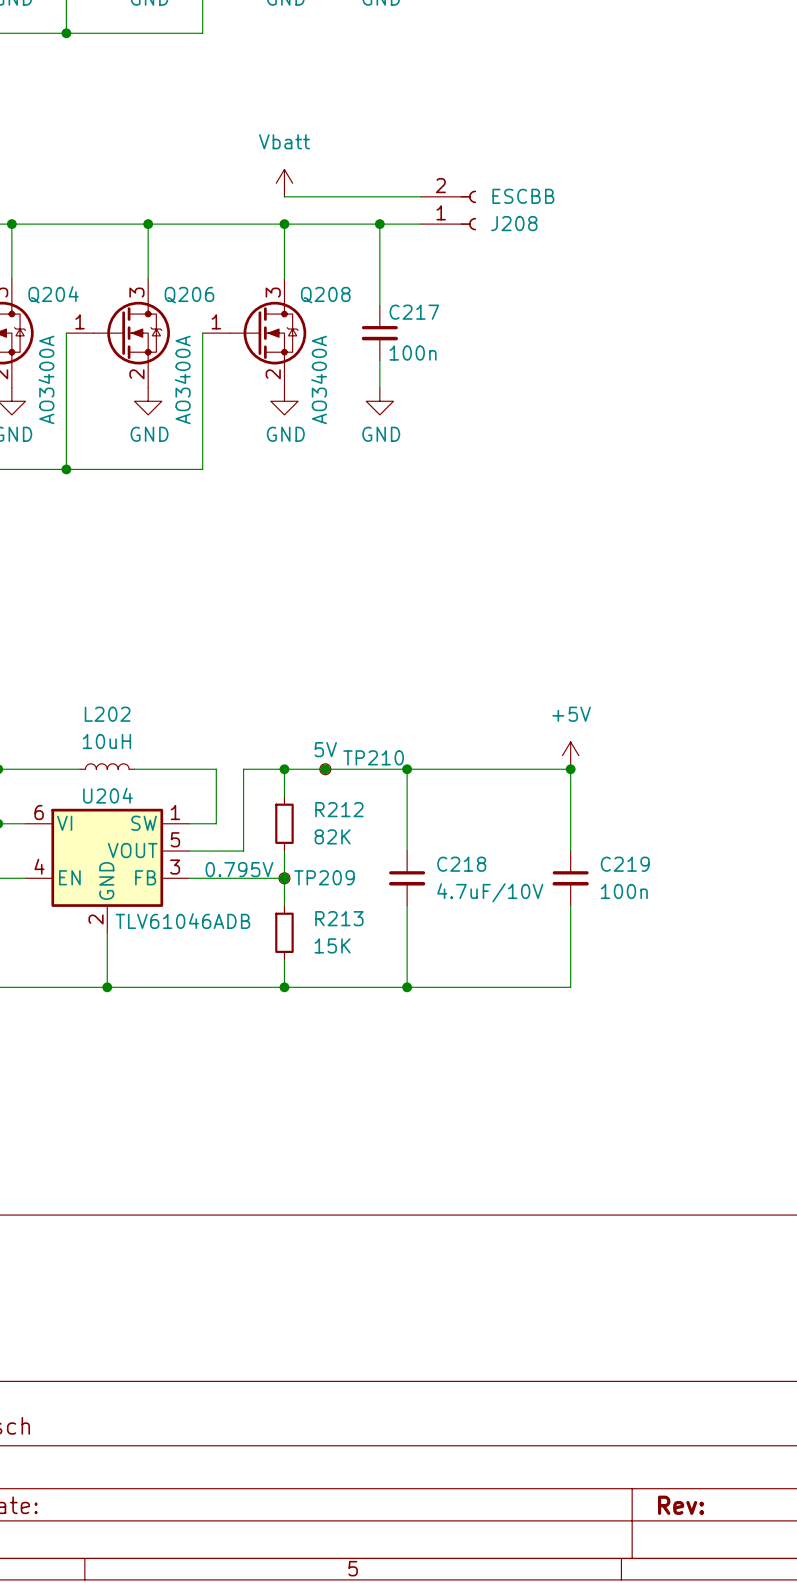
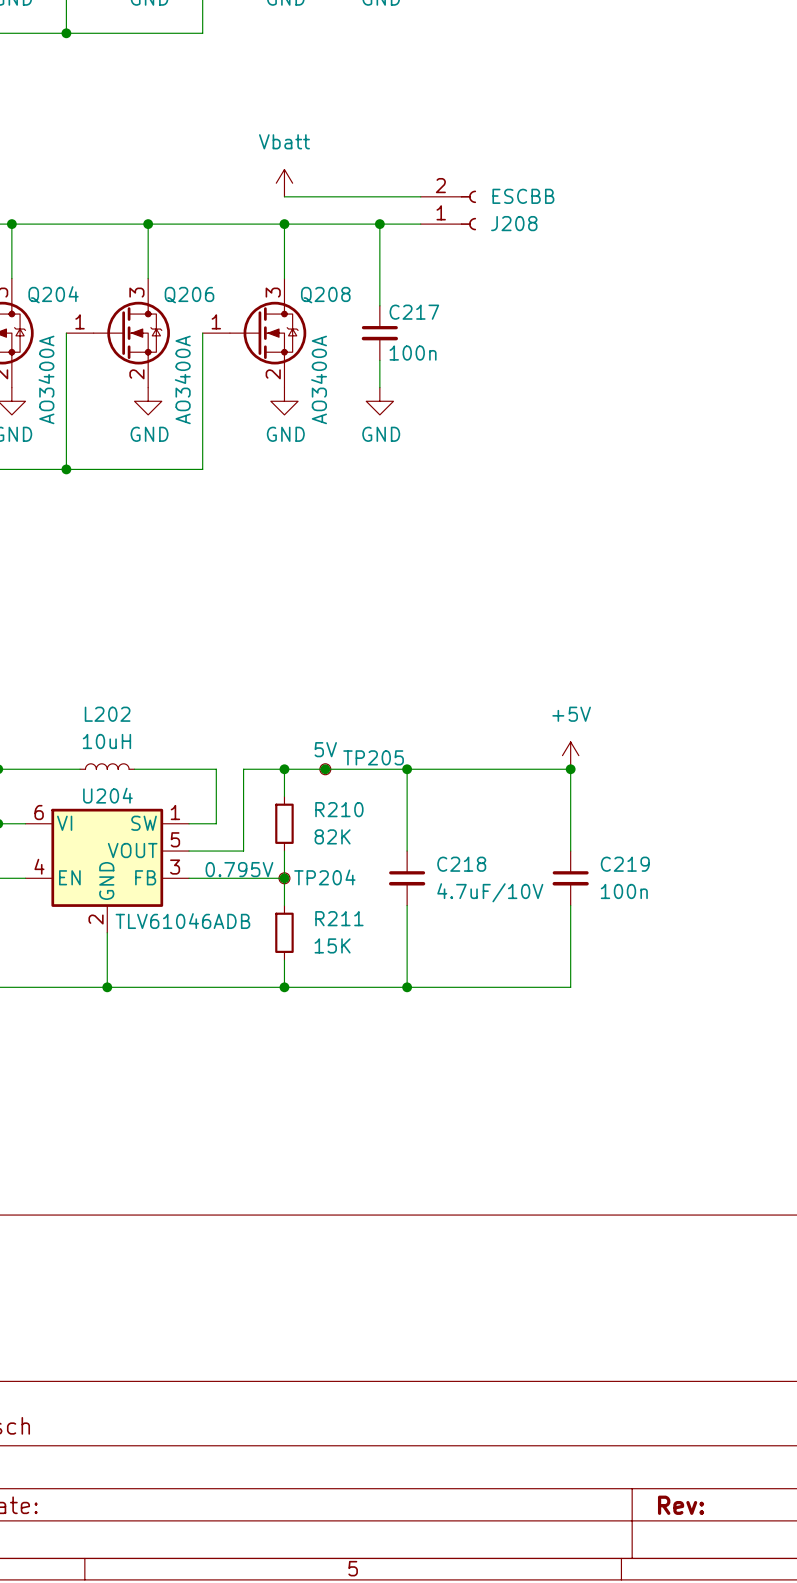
TP210 name: TP210 (373, 757) -> TP205 (373, 757)
R212 name: R212 (339, 809) -> R210 (339, 809)
TP209 name: TP209 (324, 877) -> TP204 (324, 877)
R213 name: R213 (339, 918) -> R211 (339, 918)

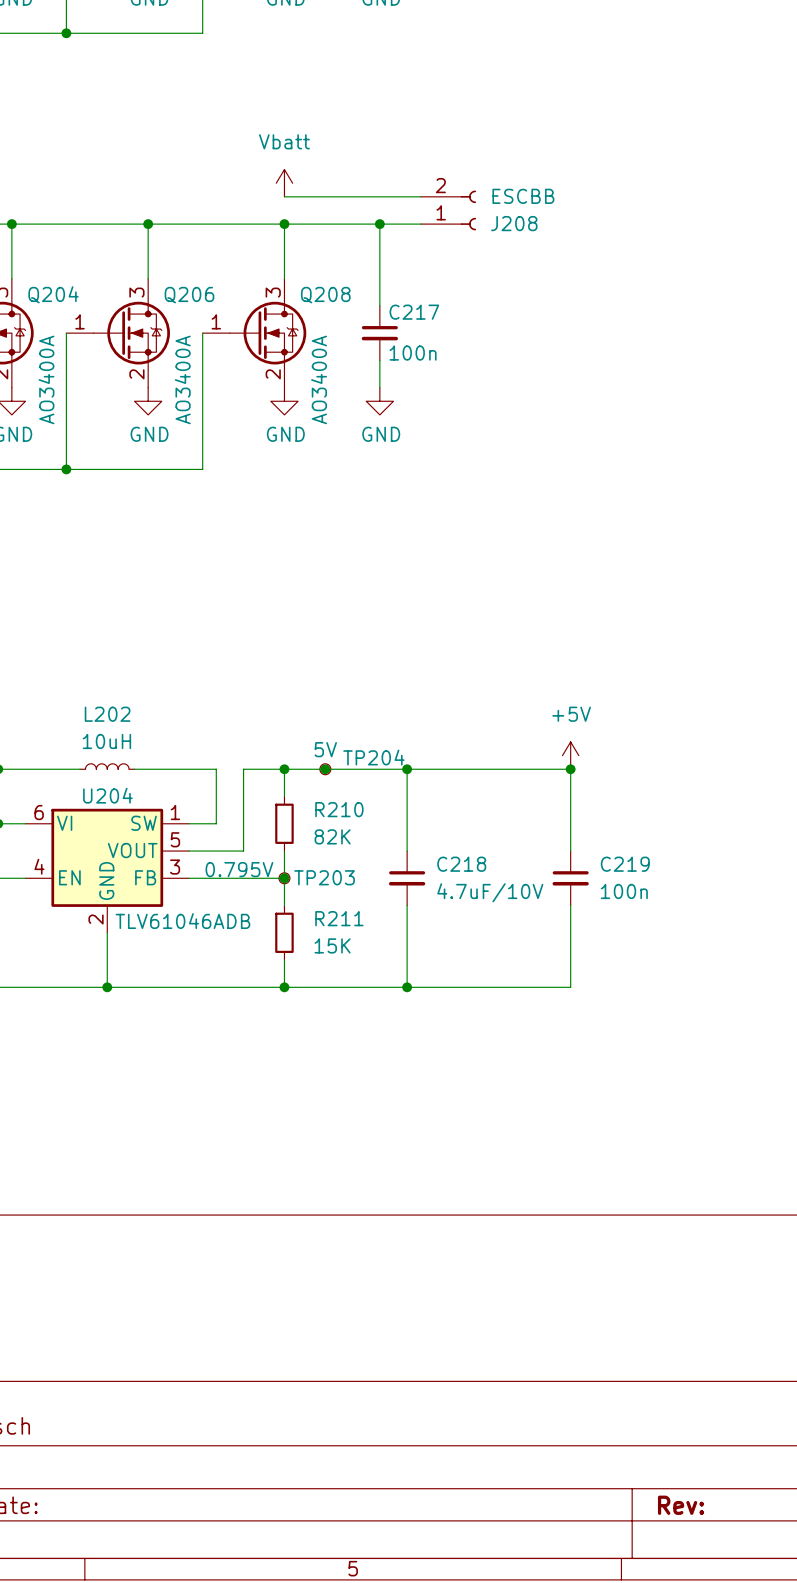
TP205 name: TP205 (373, 757) -> TP204 (373, 757)
TP204 name: TP204 (324, 877) -> TP203 (324, 877)

